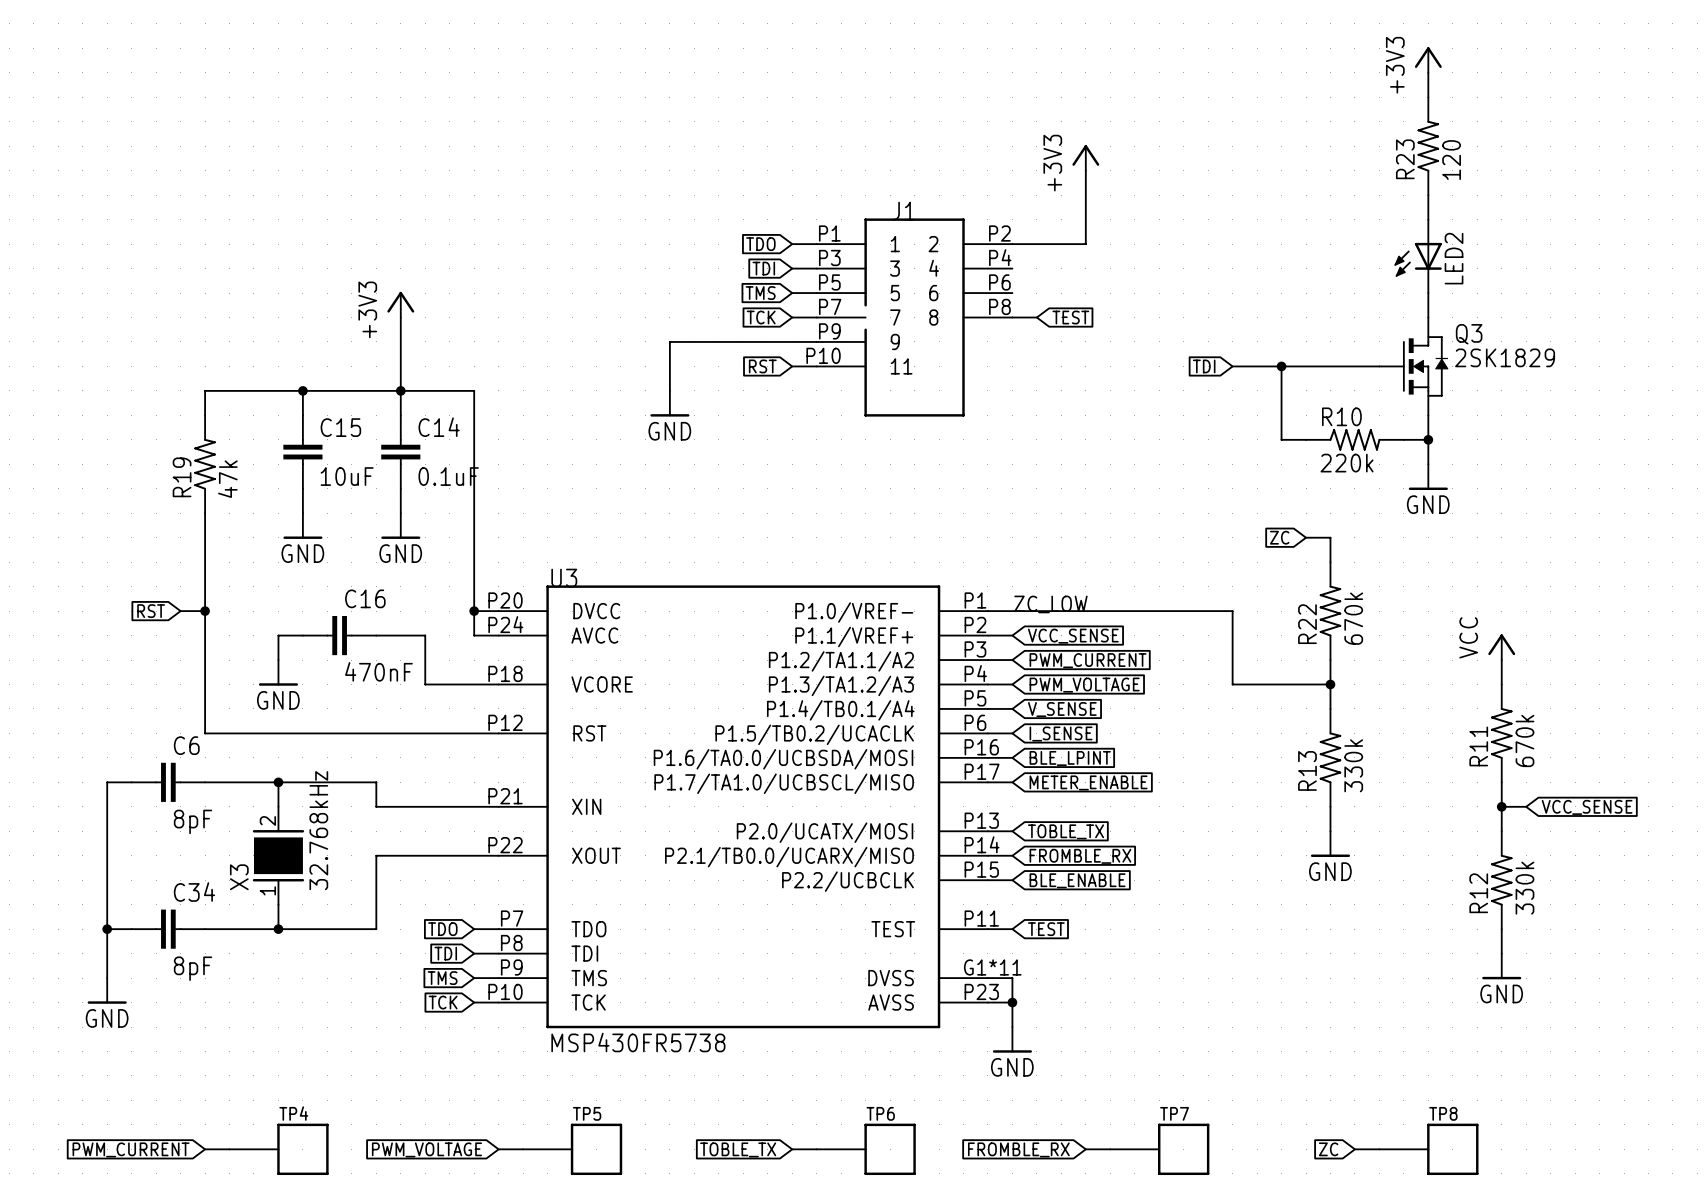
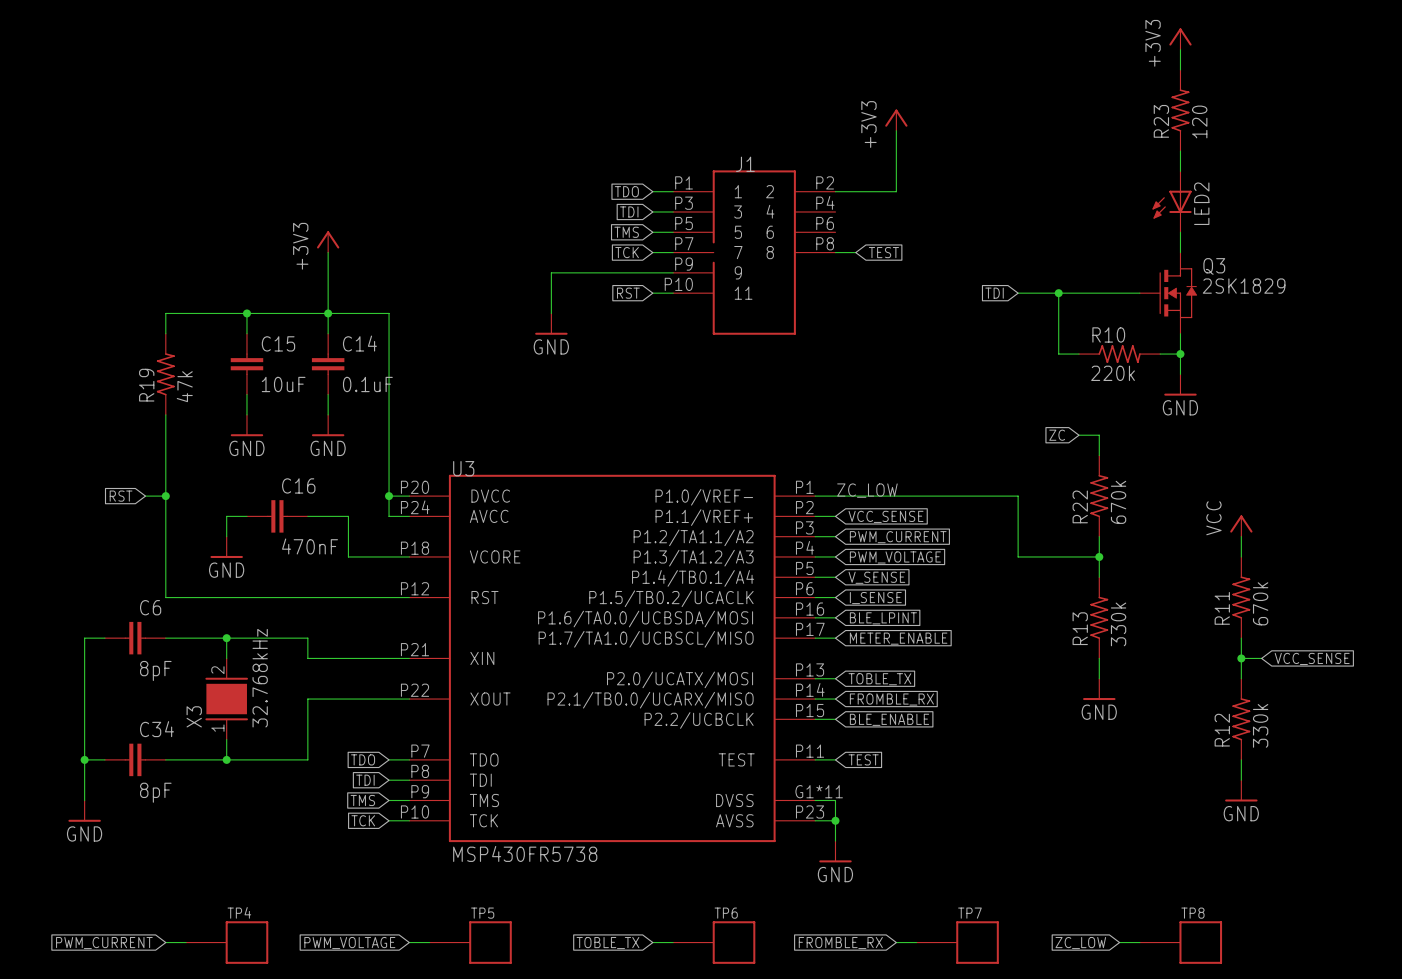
global label: ZC (1328, 1149) -> ZC_LOW (1080, 943)

